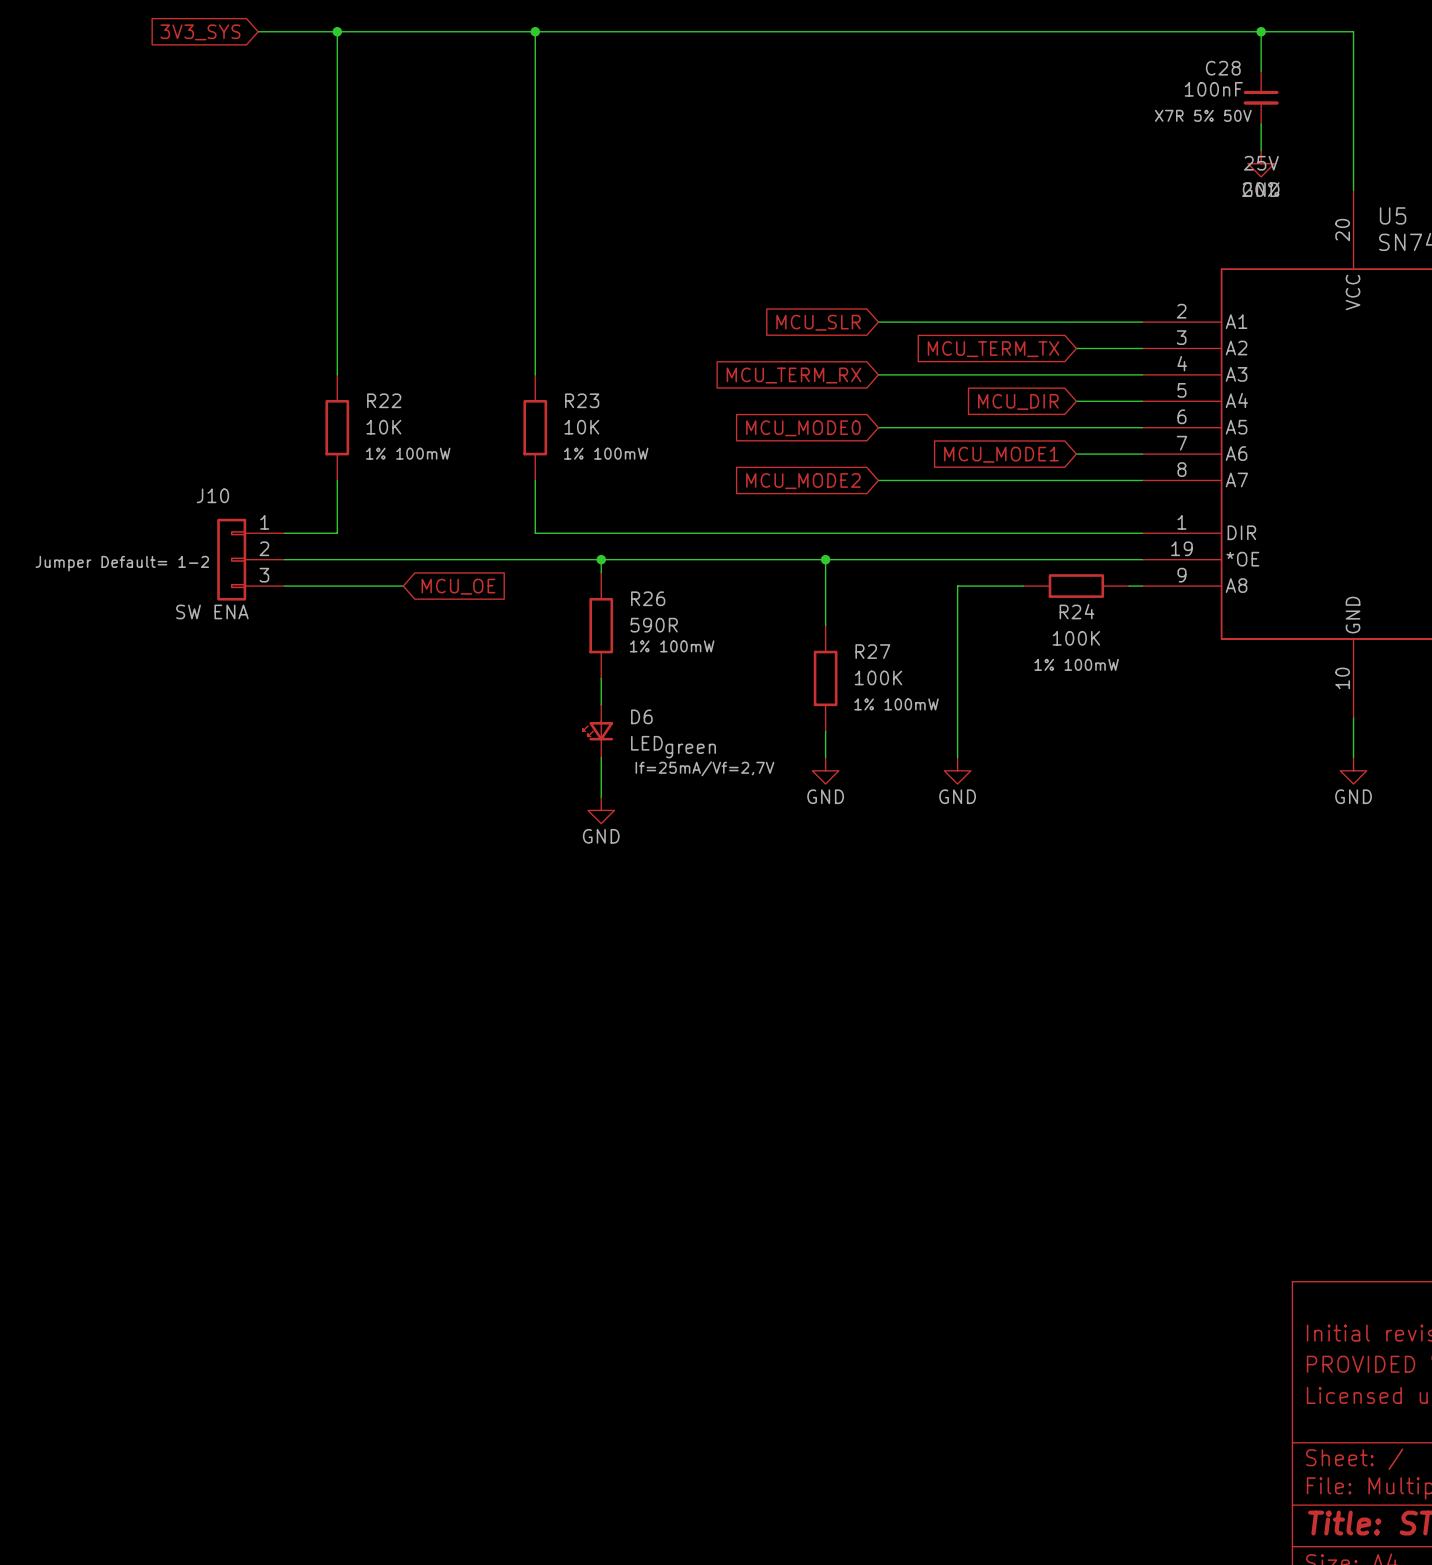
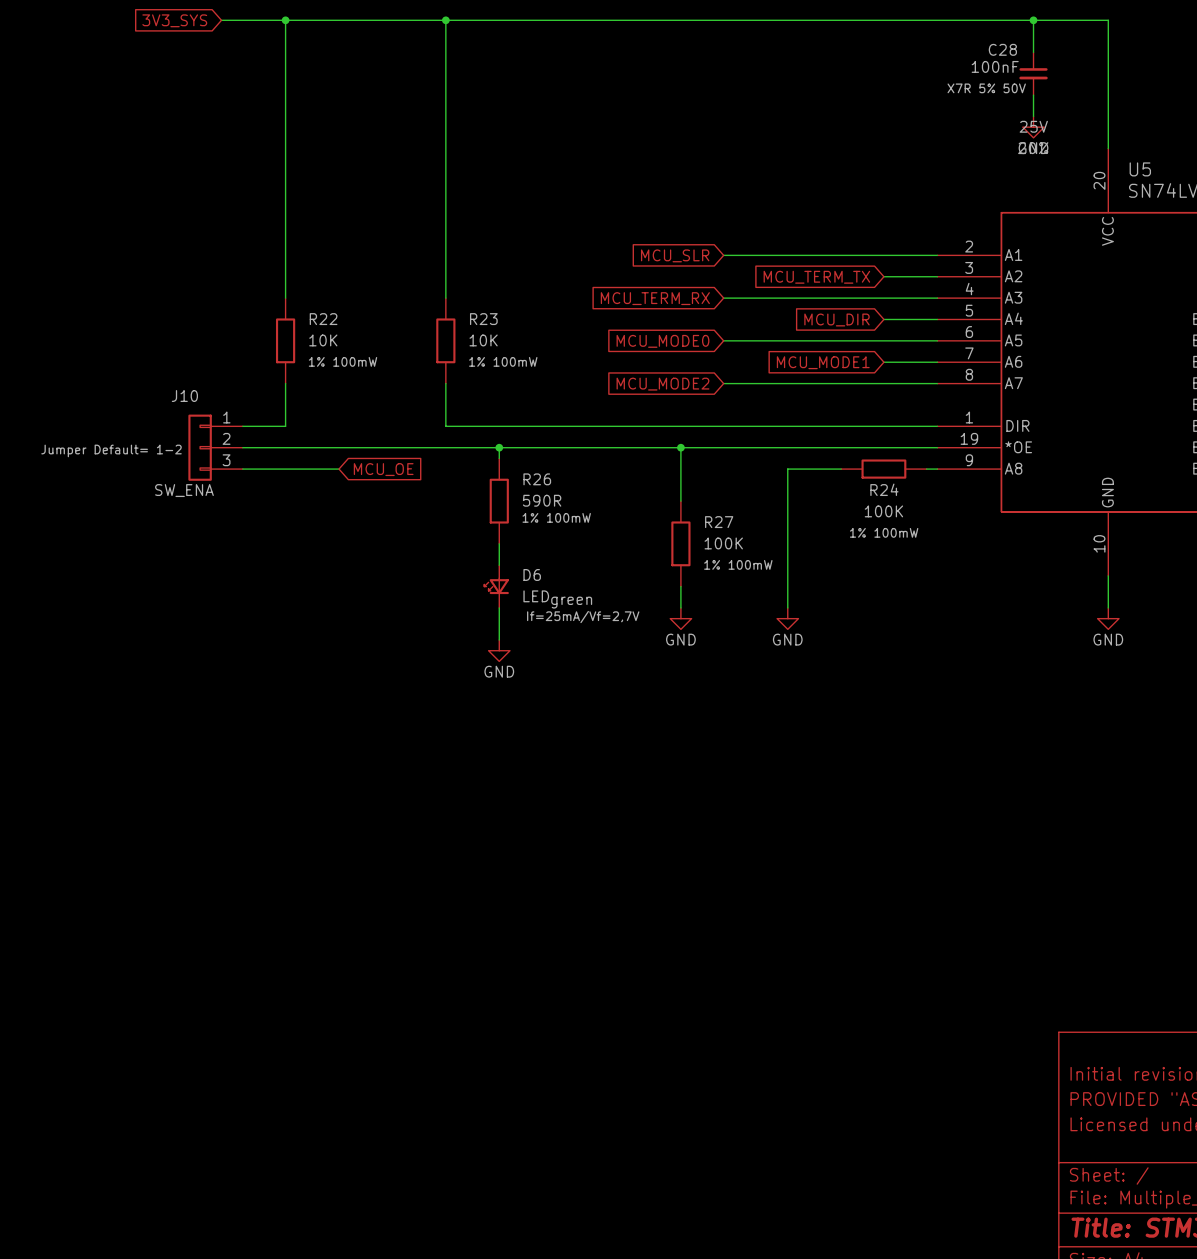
J10 value: SW ENA (212, 611) -> SW_ENA (184, 490)

